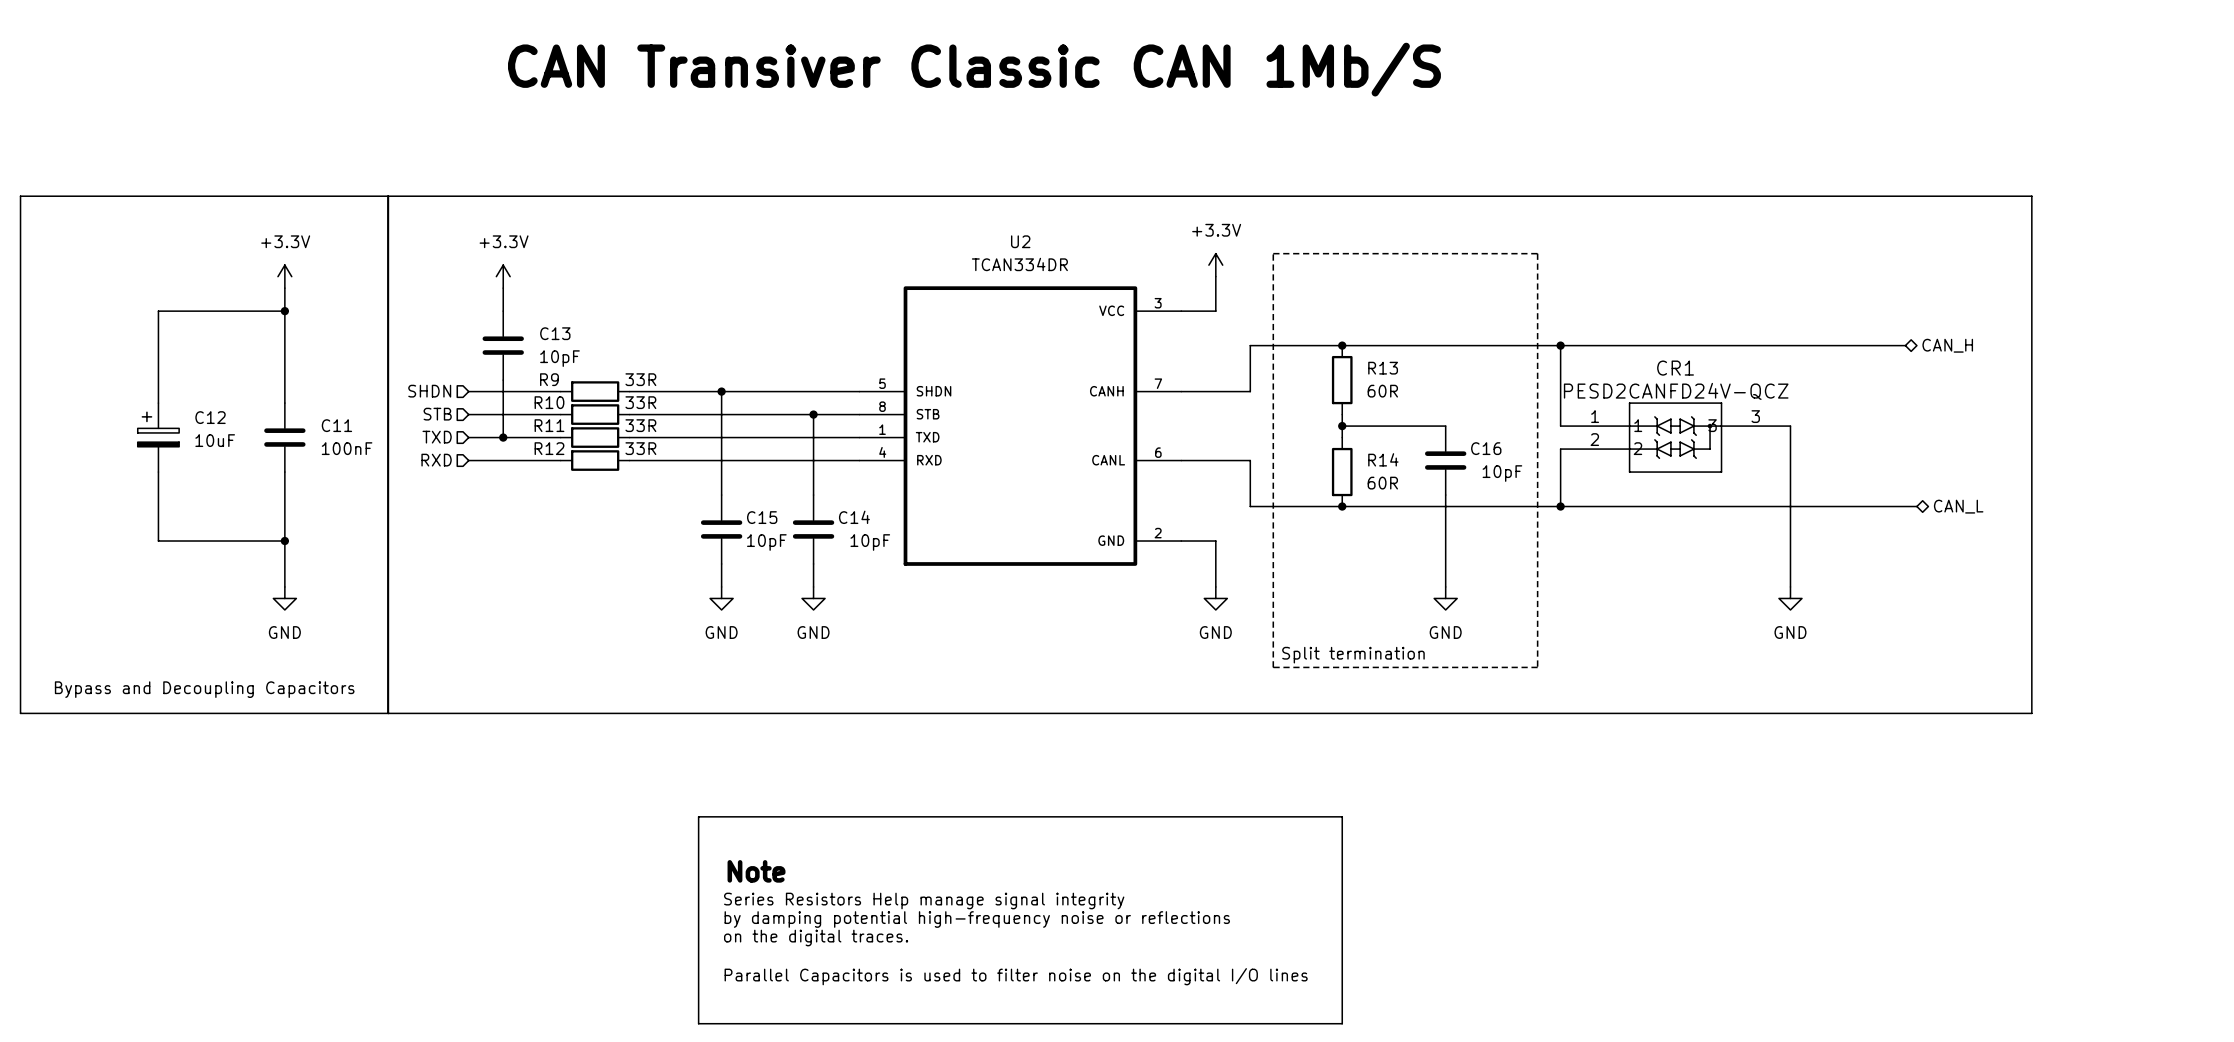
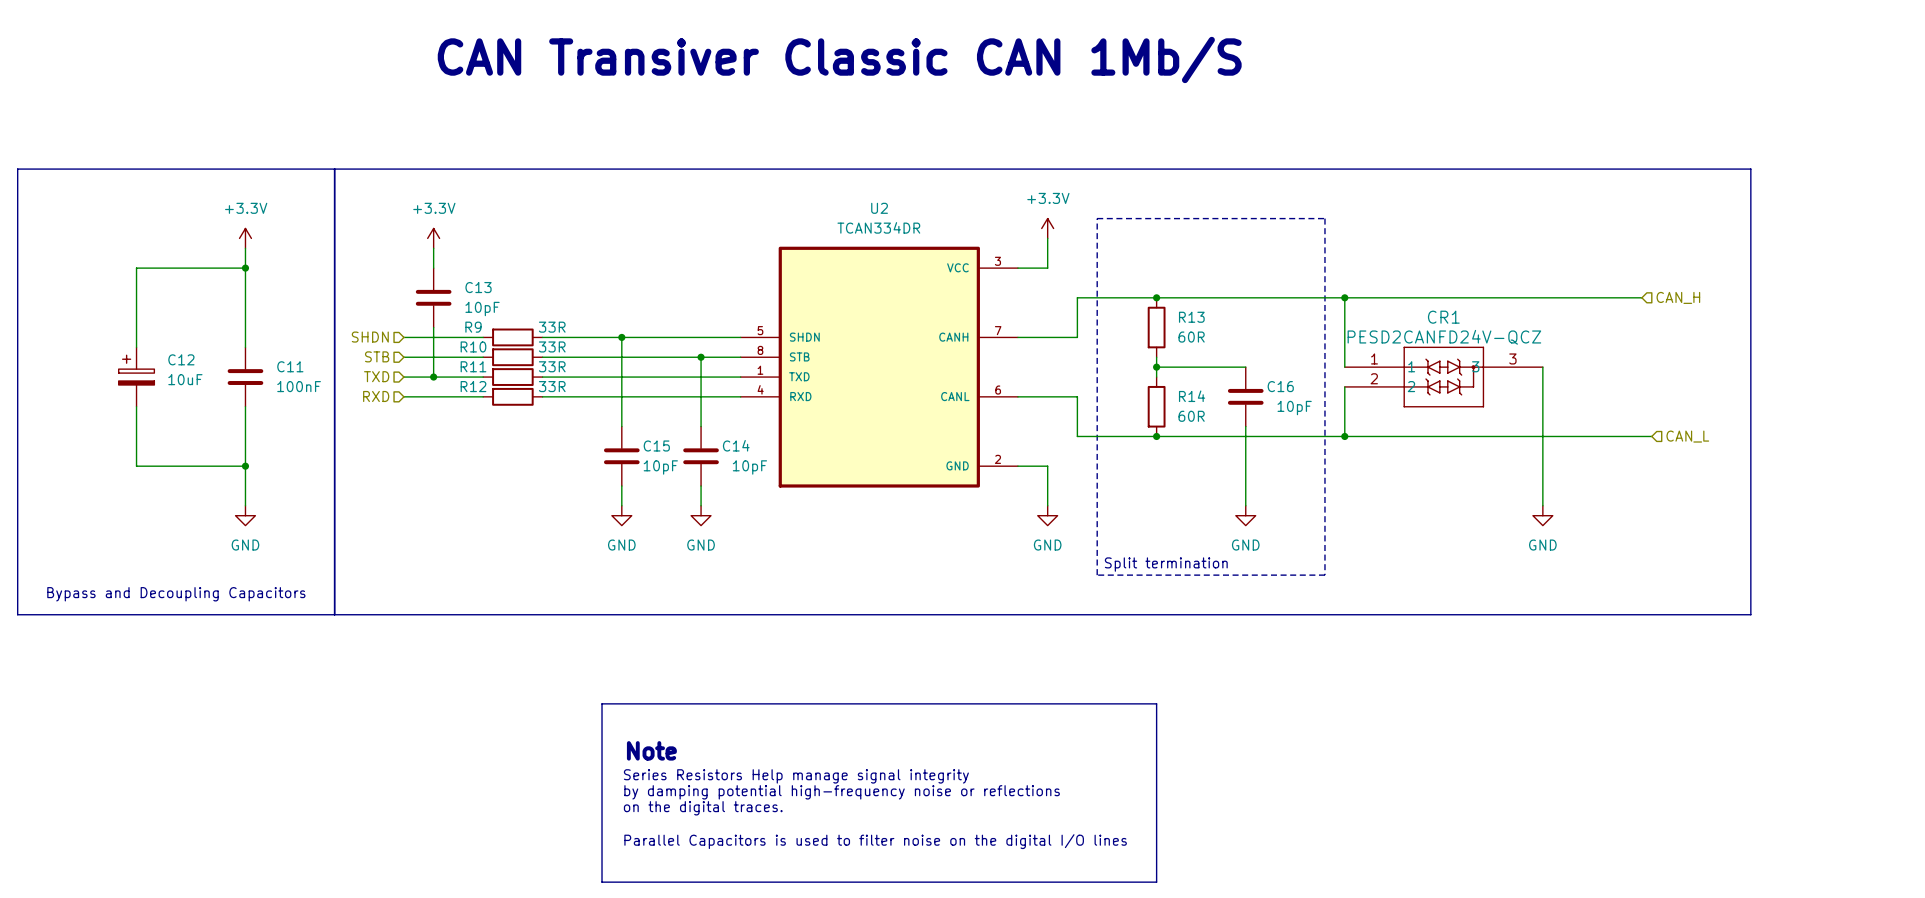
hierarchical label shape: bidirectional (1947, 345) -> input (1678, 297)
hierarchical label shape: bidirectional (1958, 506) -> input (1687, 436)

